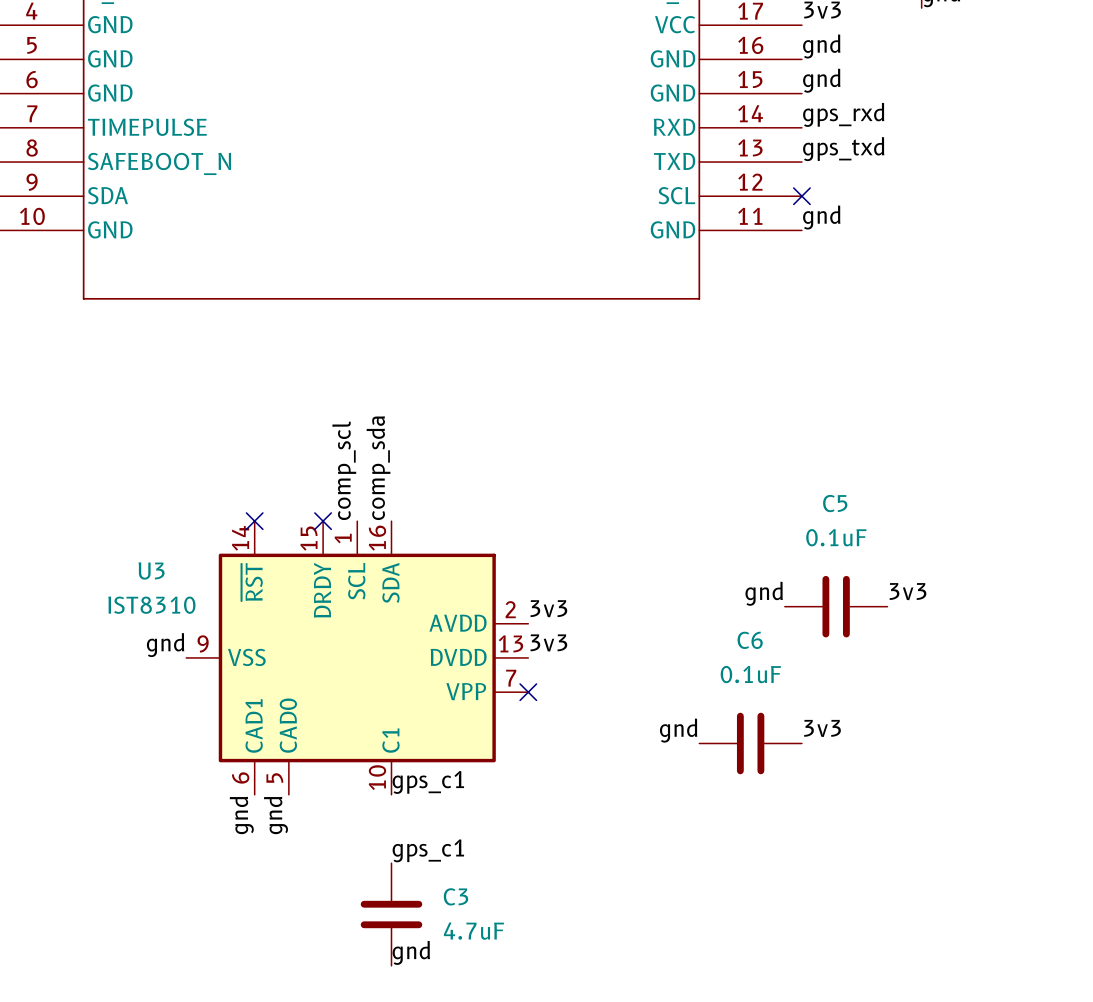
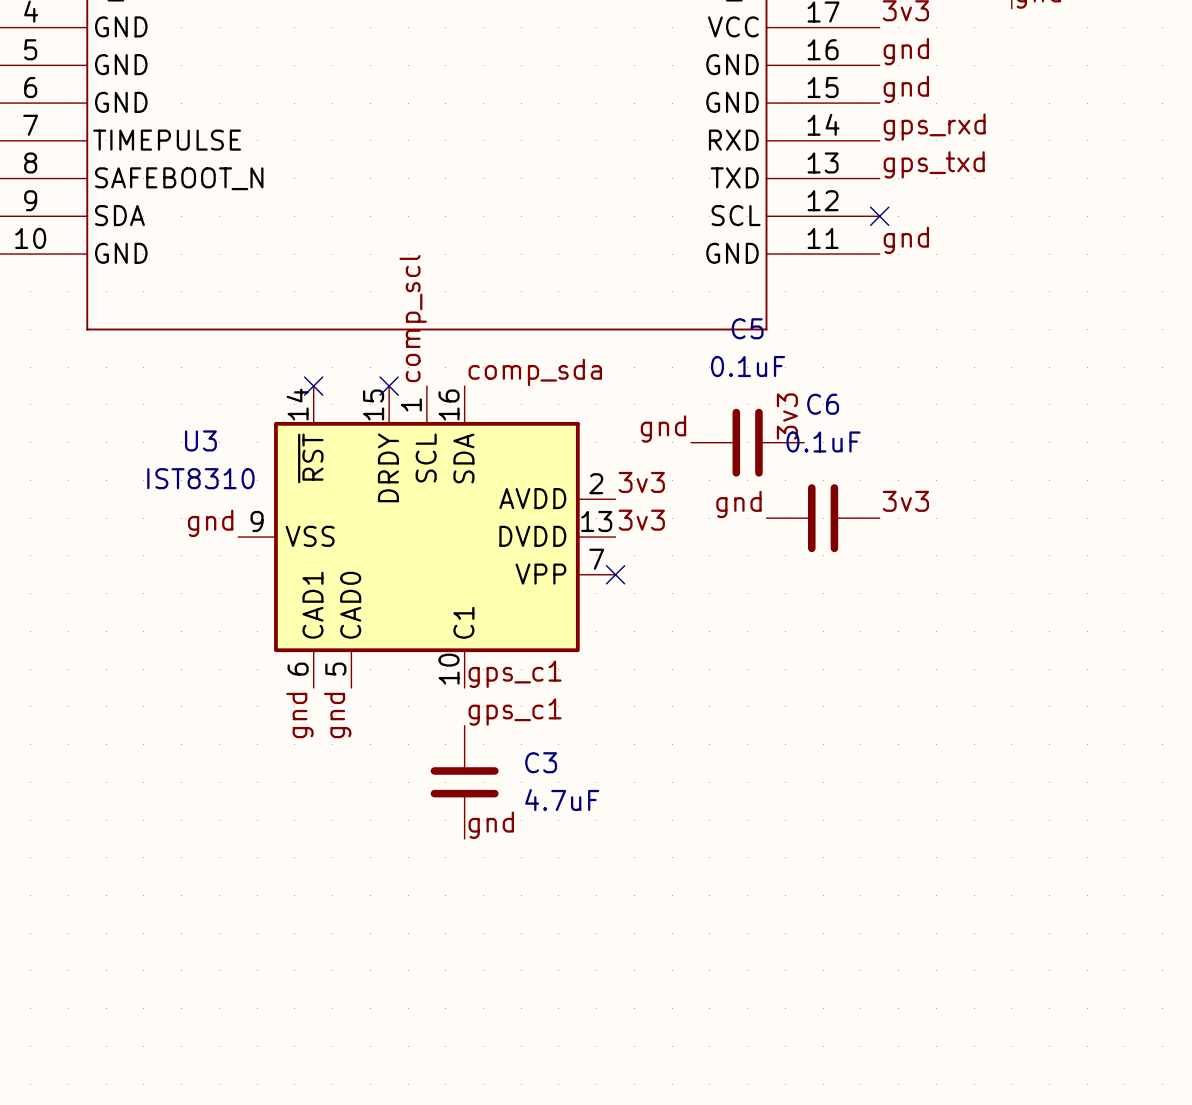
no-connect mark: none -> (313, 386)
no-connect mark: none -> (389, 386)
label: none -> 3v3 (787, 416)
label: none -> gnd (663, 429)
label: none -> 3v3 (641, 482)
label: none -> 3v3 (905, 501)
label: none -> gnd (738, 504)
label rotation: 0° (378, 468) -> 90° clockwise (535, 372)
label position: comp_sda (378, 468) -> comp_sda (535, 372)
label position: comp_scl (344, 470) -> comp_scl (413, 318)
label: none -> 3v3 (641, 520)
label: none -> gnd (210, 523)
no-connect mark: (254, 521) -> none
no-connect mark: (323, 521) -> none
no-connect mark: none -> (615, 574)
label: 3v3 (908, 591) -> none
label: gnd (764, 593) -> none
C5 position: (836, 606) -> (747, 442)
label: 3v3 (548, 608) -> none
label: none -> gps_c1 (515, 674)
label: 3v3 (548, 642) -> none
label: none -> gnd (299, 715)
label: none -> gnd (337, 715)
label: gnd (165, 645) -> none
label: none -> gps_c1 (515, 712)
U3 position: (357, 657) -> (426, 537)
no-connect mark: (528, 692) -> none
label: 3v3 (822, 728) -> none
label: gnd (678, 730) -> none
C6 position: (750, 743) -> (823, 518)
label: none -> gnd (491, 825)
label: gps_c1 (428, 782) -> none
label: gnd (241, 815) -> none
label: gnd (275, 815) -> none
label: gps_c1 (428, 850) -> none
C3 position: (391, 914) -> (464, 782)
label: gnd (411, 952) -> none

